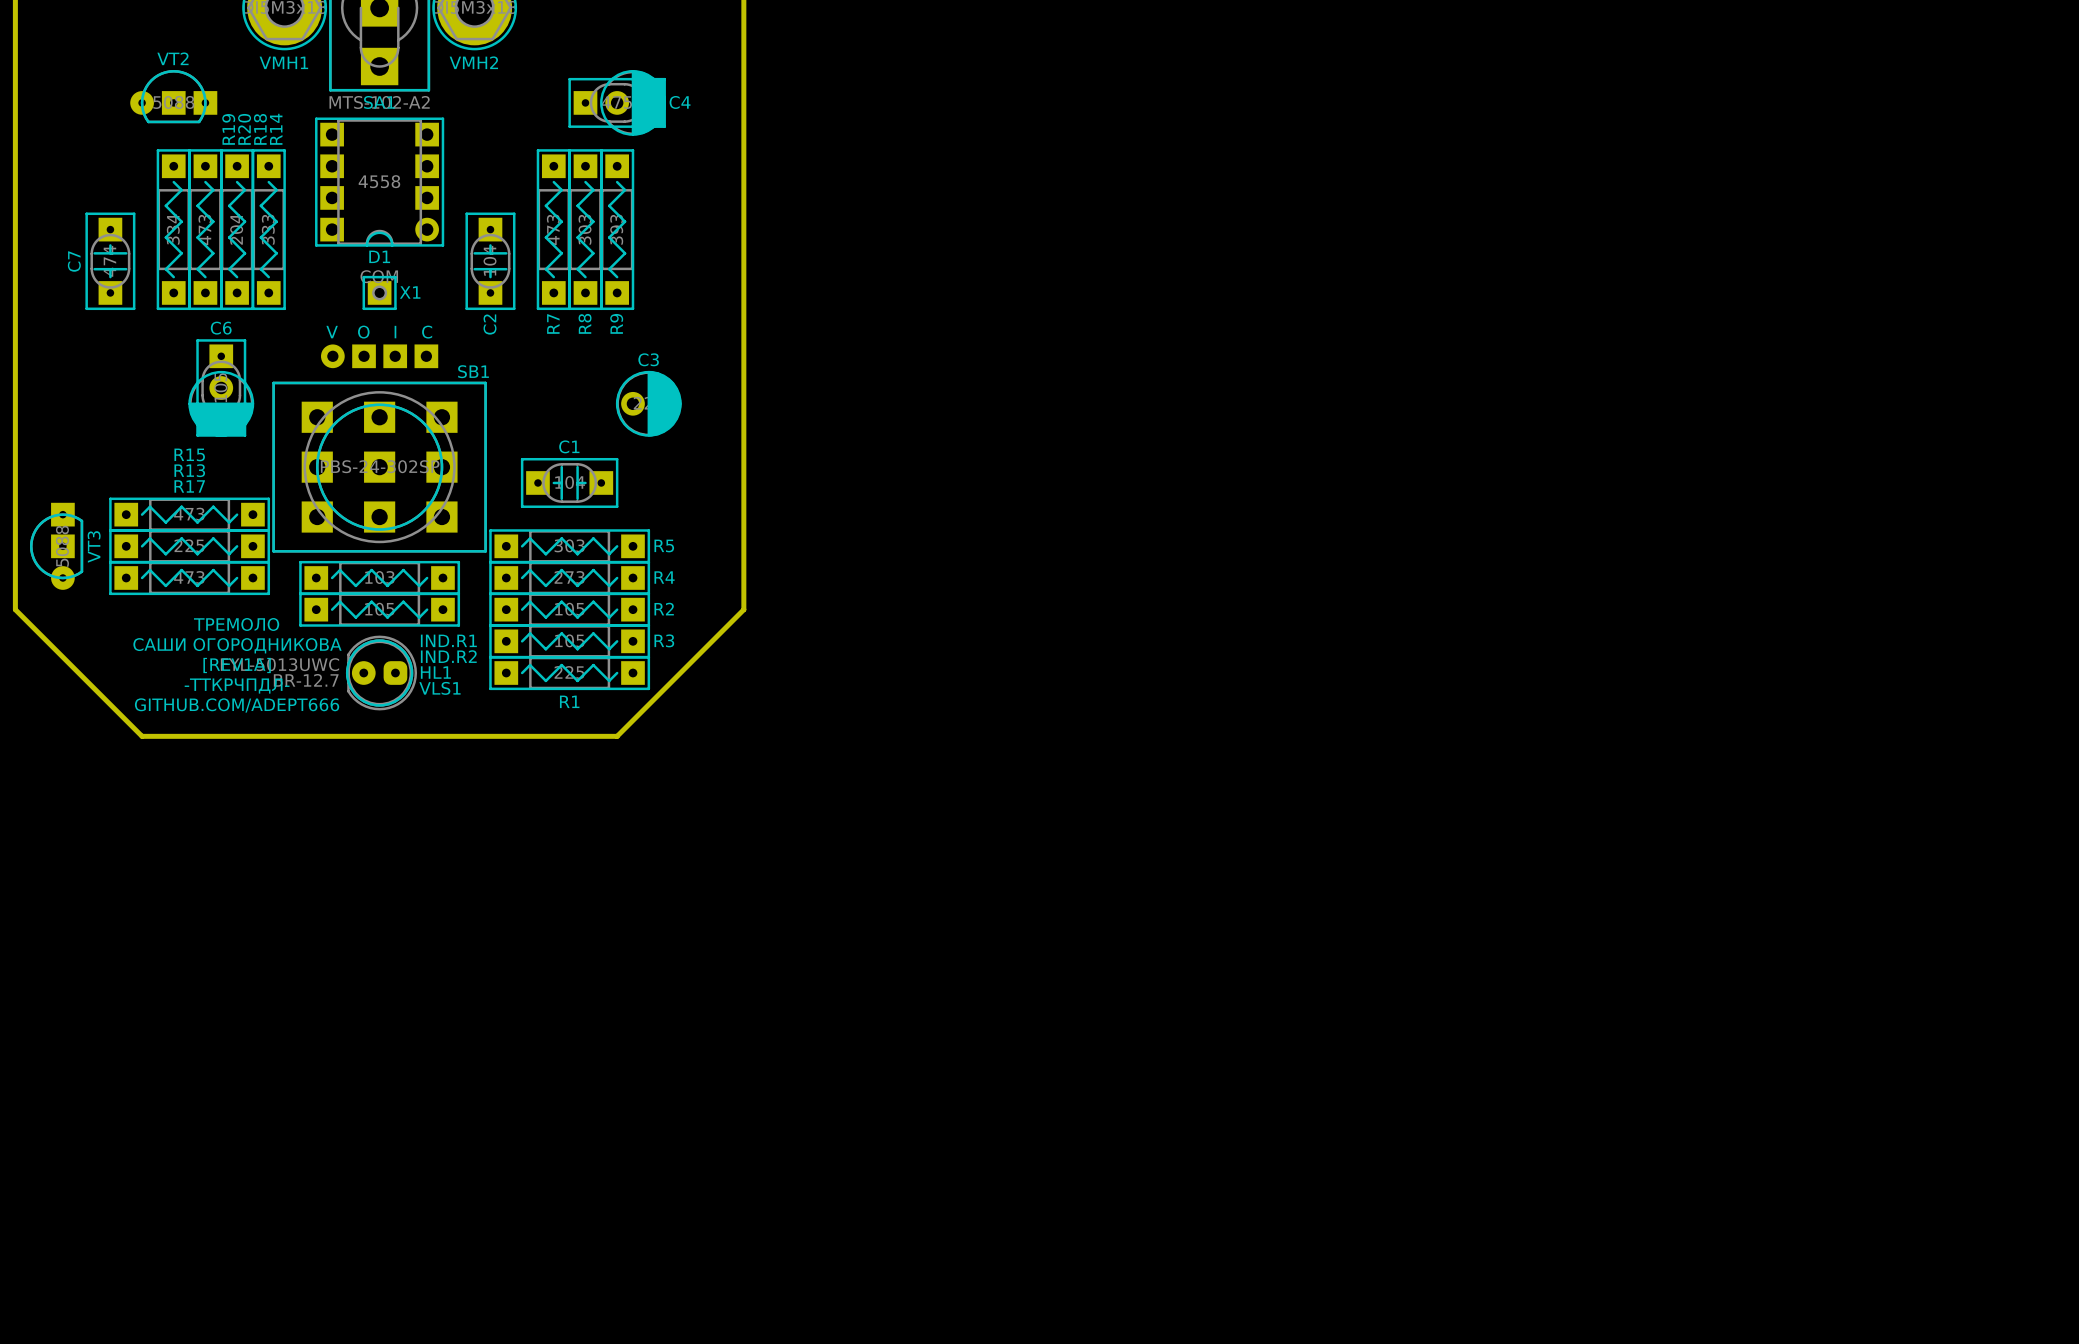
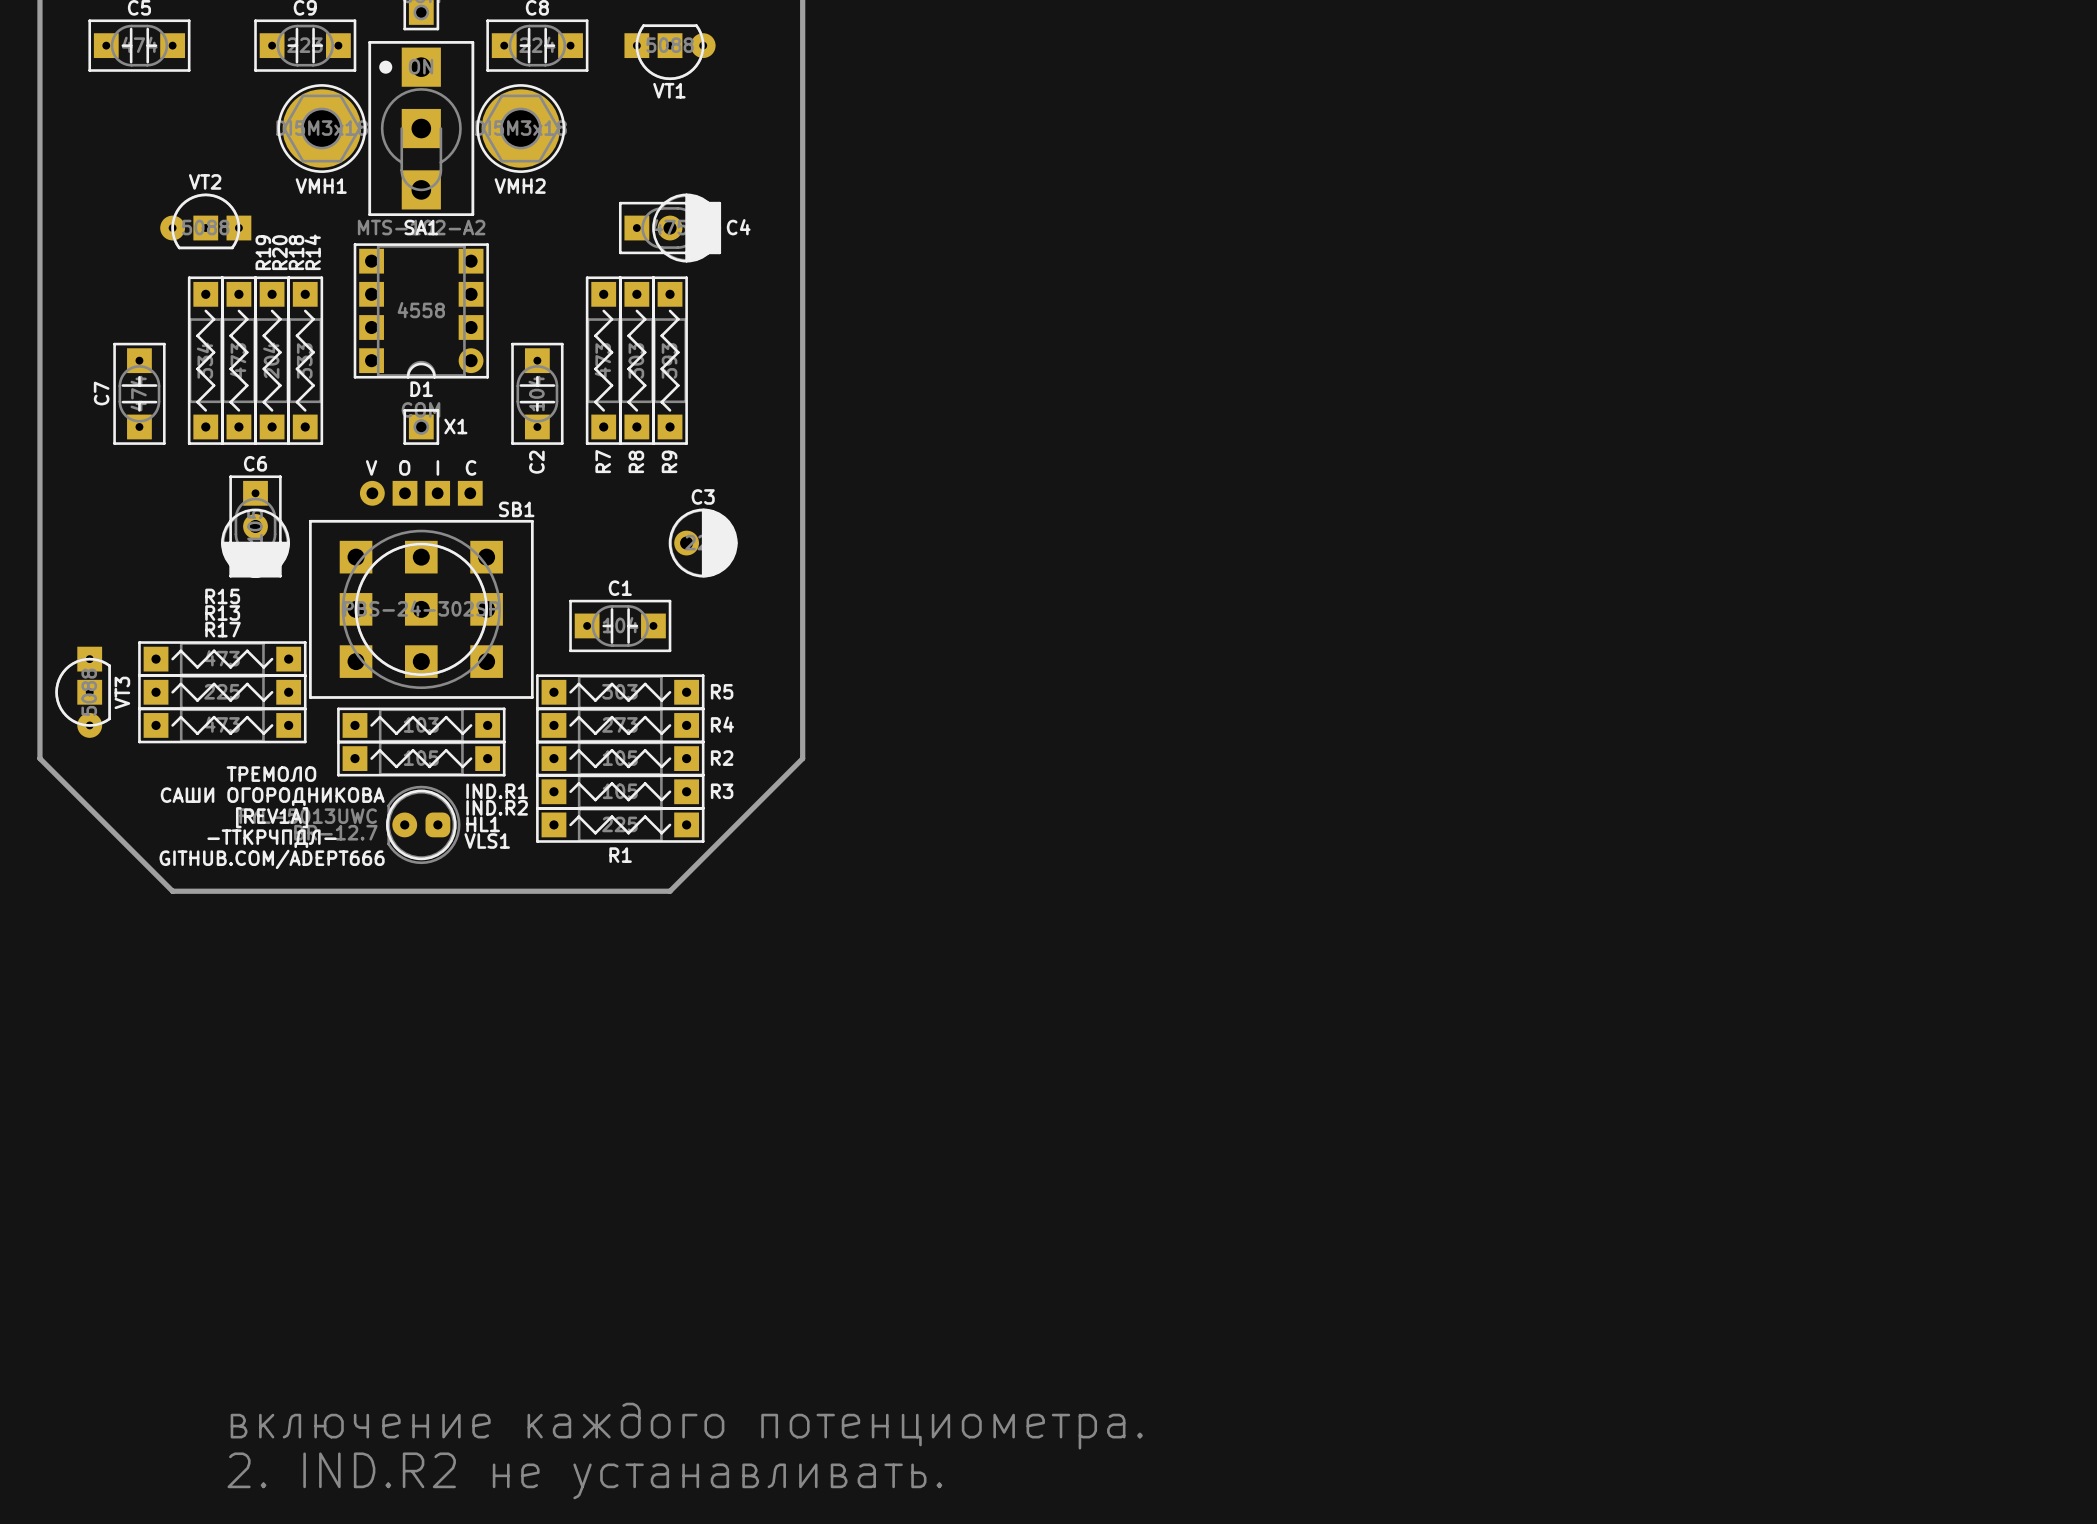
text: none -> включение каждого потенциометра. (686, 1426)
text: none -> 2. IND.R2 не устанавливать. (584, 1475)

